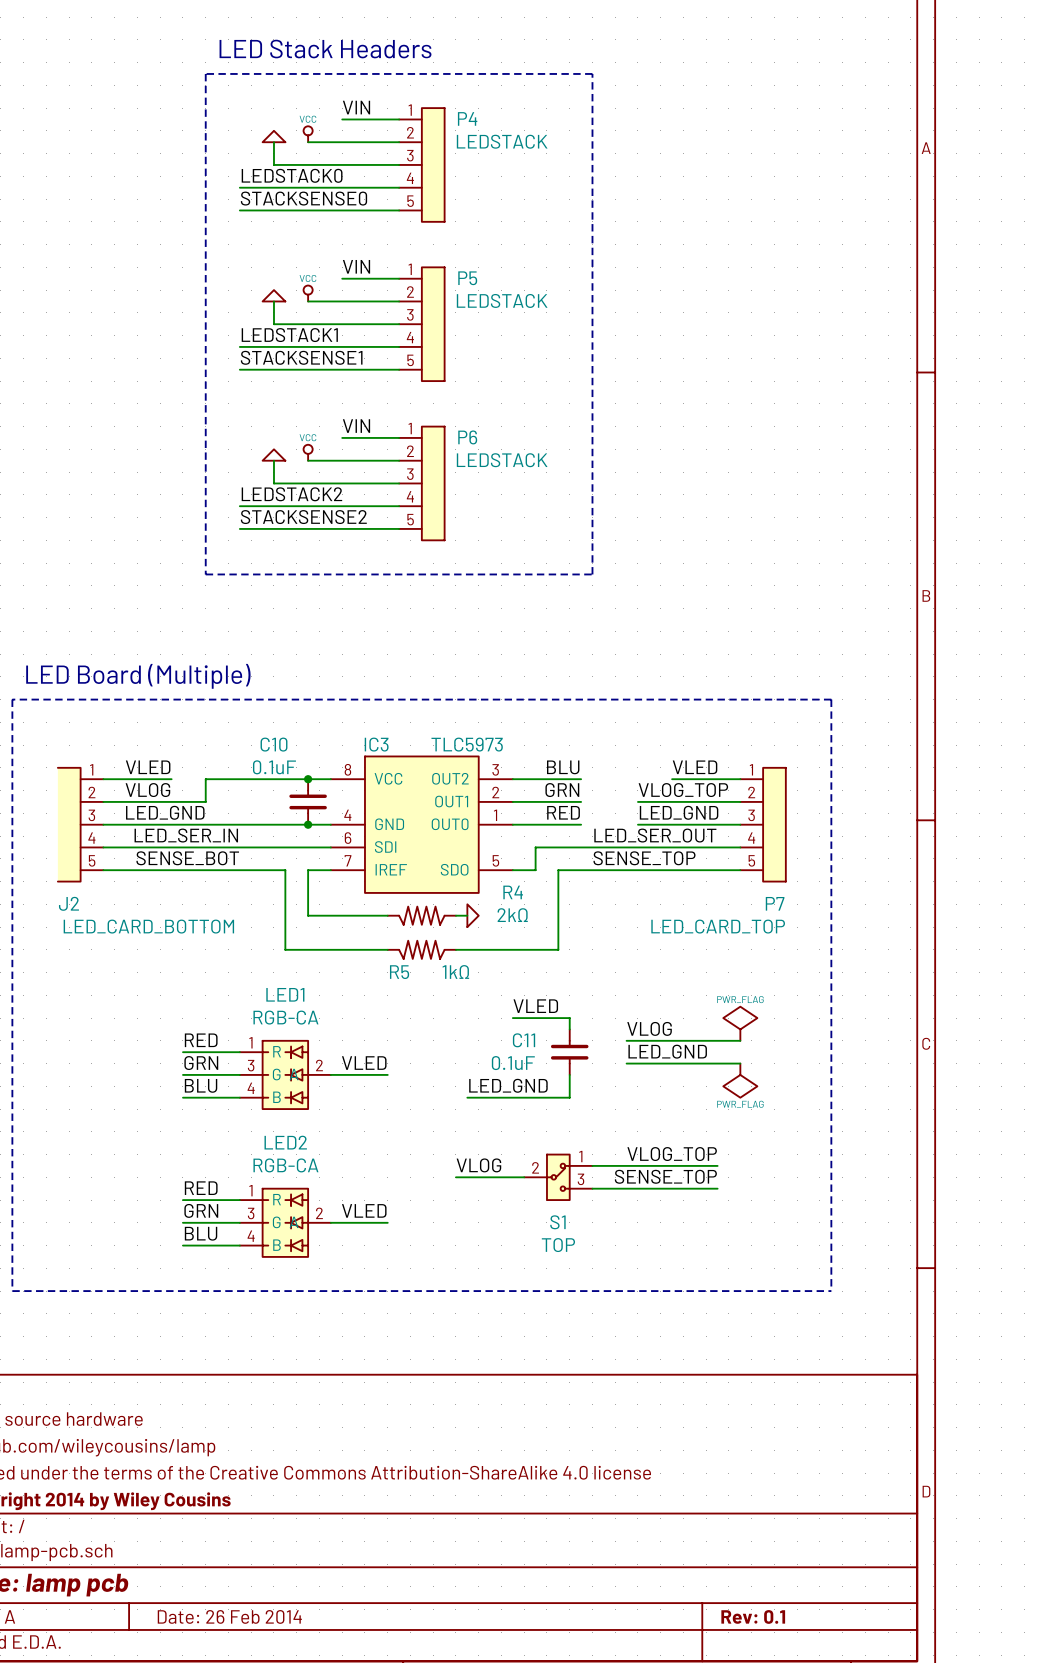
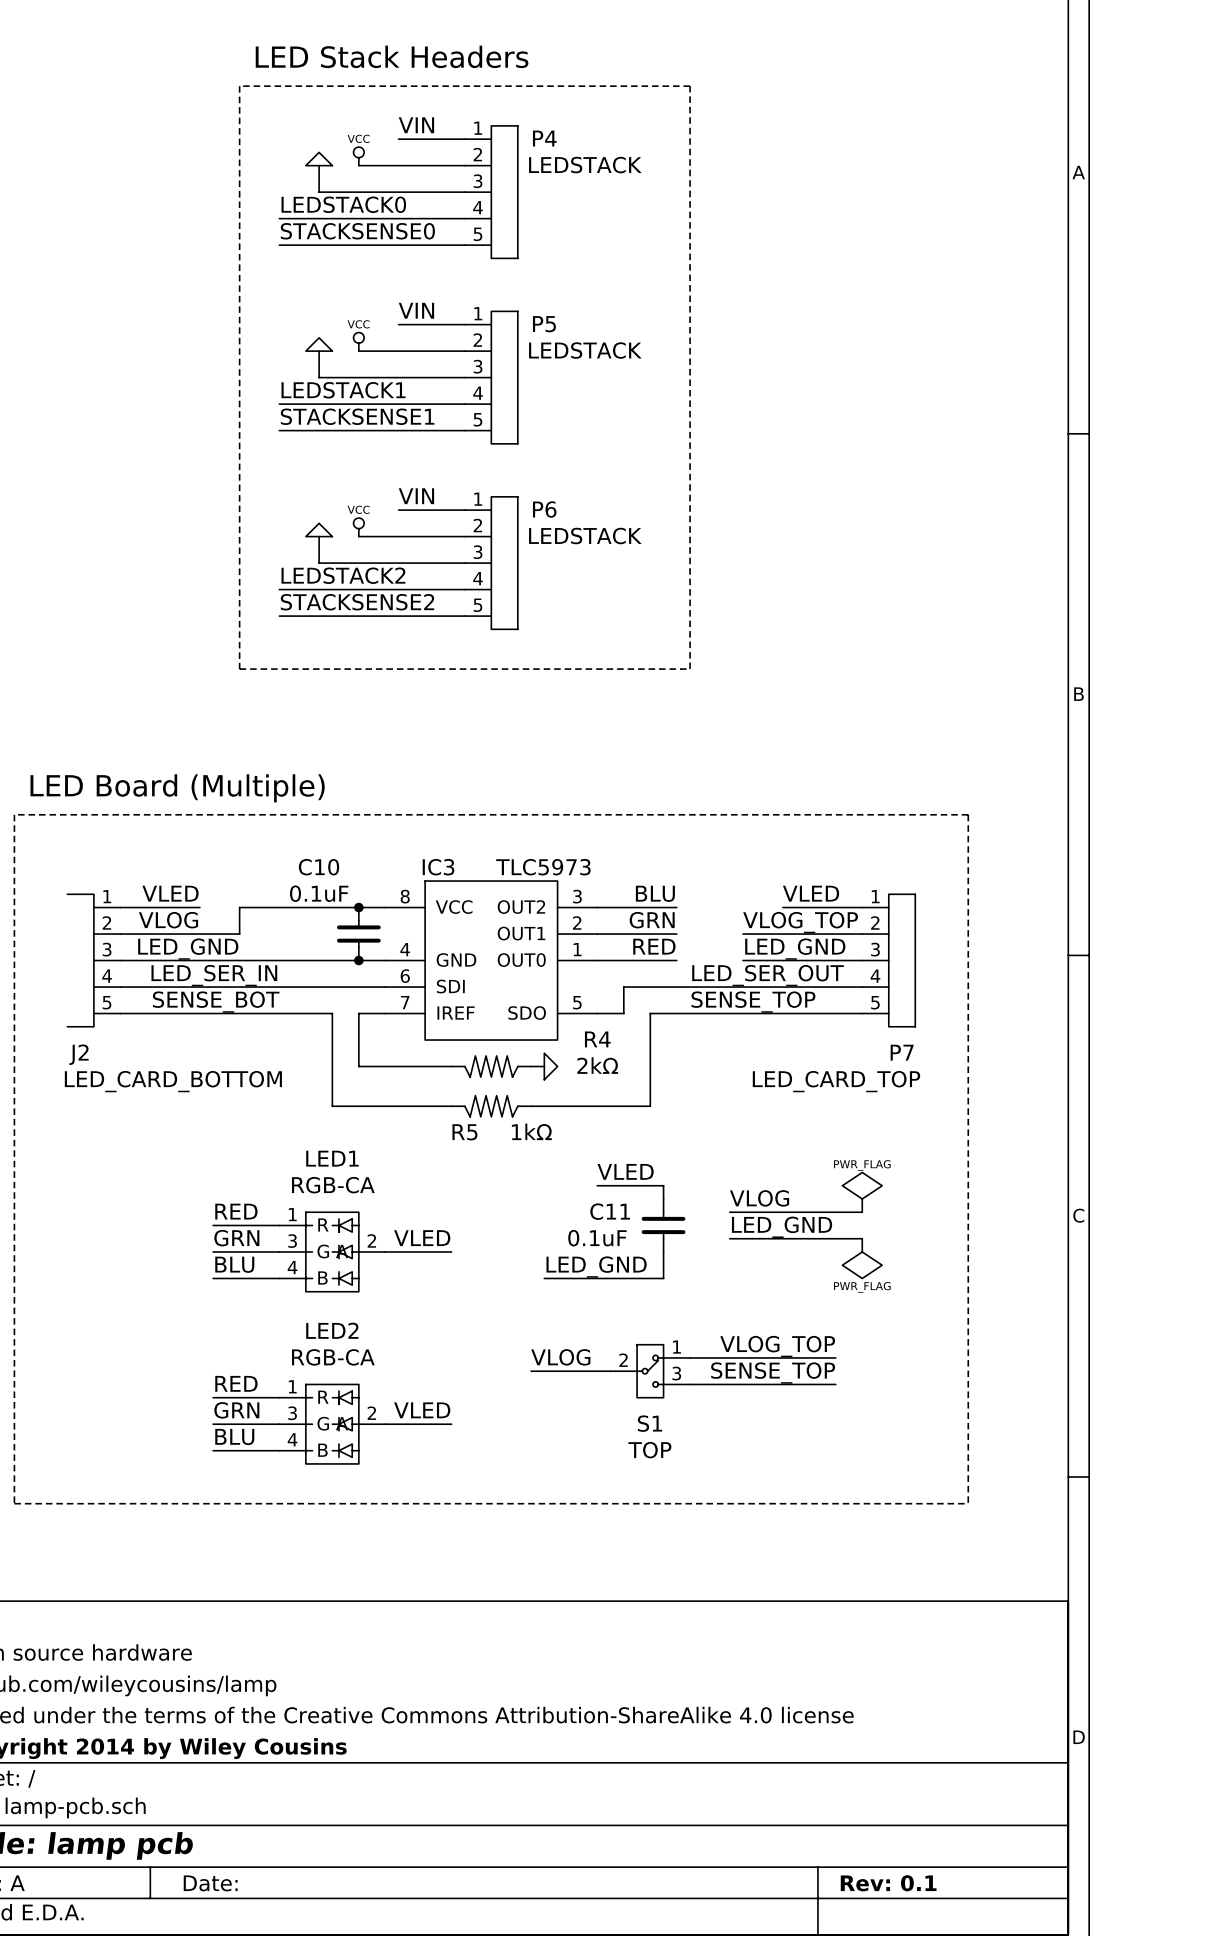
title block: Date: 26 Feb 2014 (229, 1616) -> Date: (210, 1883)

